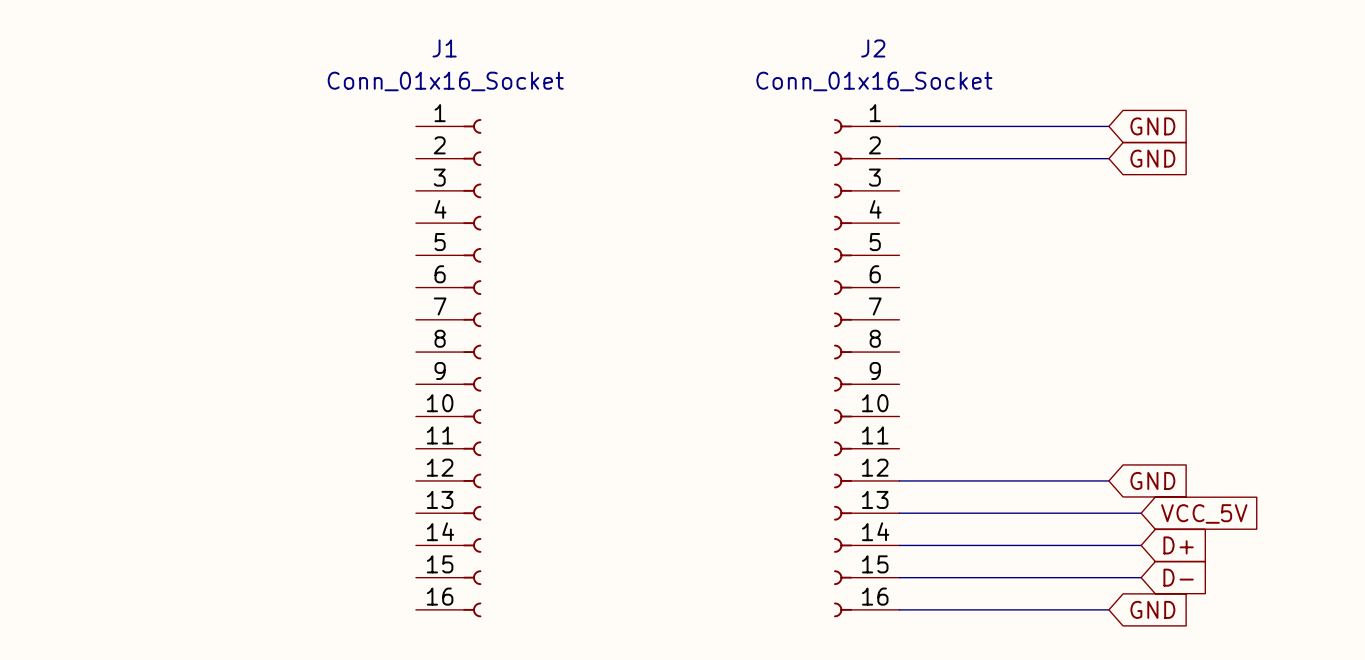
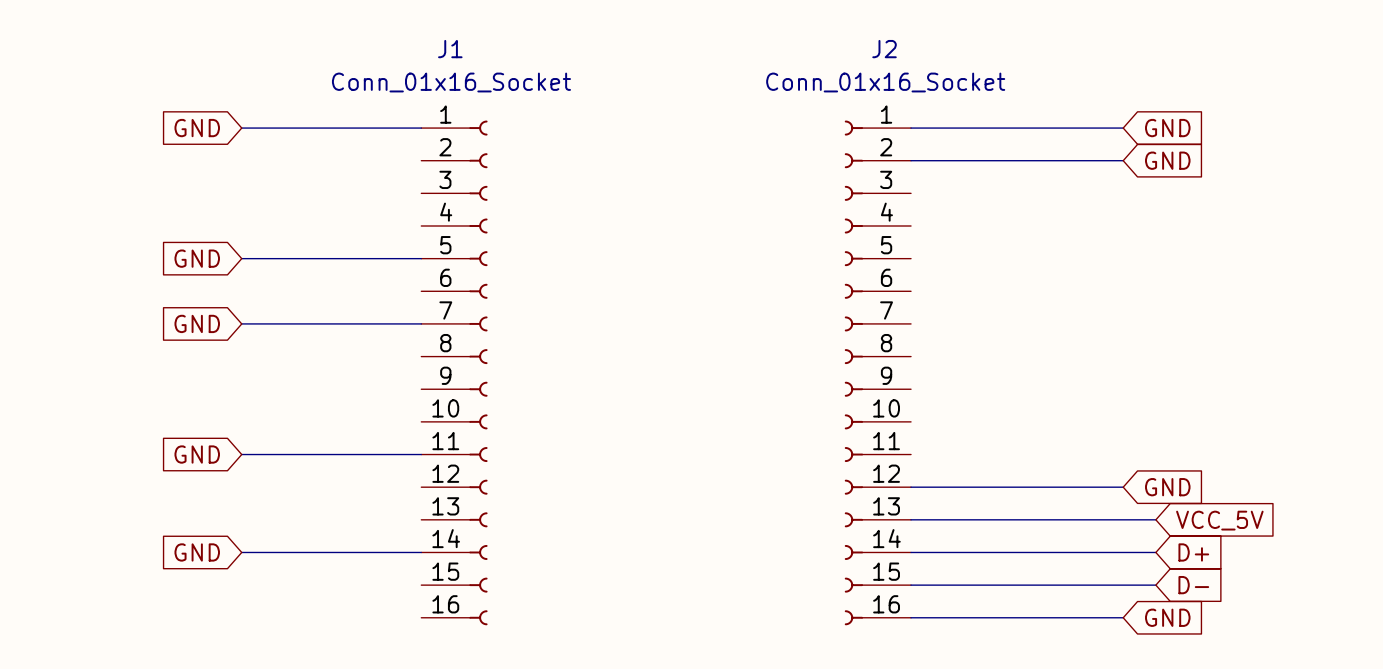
global label: none -> GND (197, 128)
wire: none -> (241, 128) (421, 128)
global label: none -> GND (197, 258)
wire: none -> (241, 258) (421, 258)
global label: none -> GND (197, 323)
wire: none -> (241, 323) (421, 323)
global label: none -> GND (197, 454)
wire: none -> (241, 454) (421, 454)
global label: none -> GND (197, 552)
wire: none -> (241, 552) (421, 552)

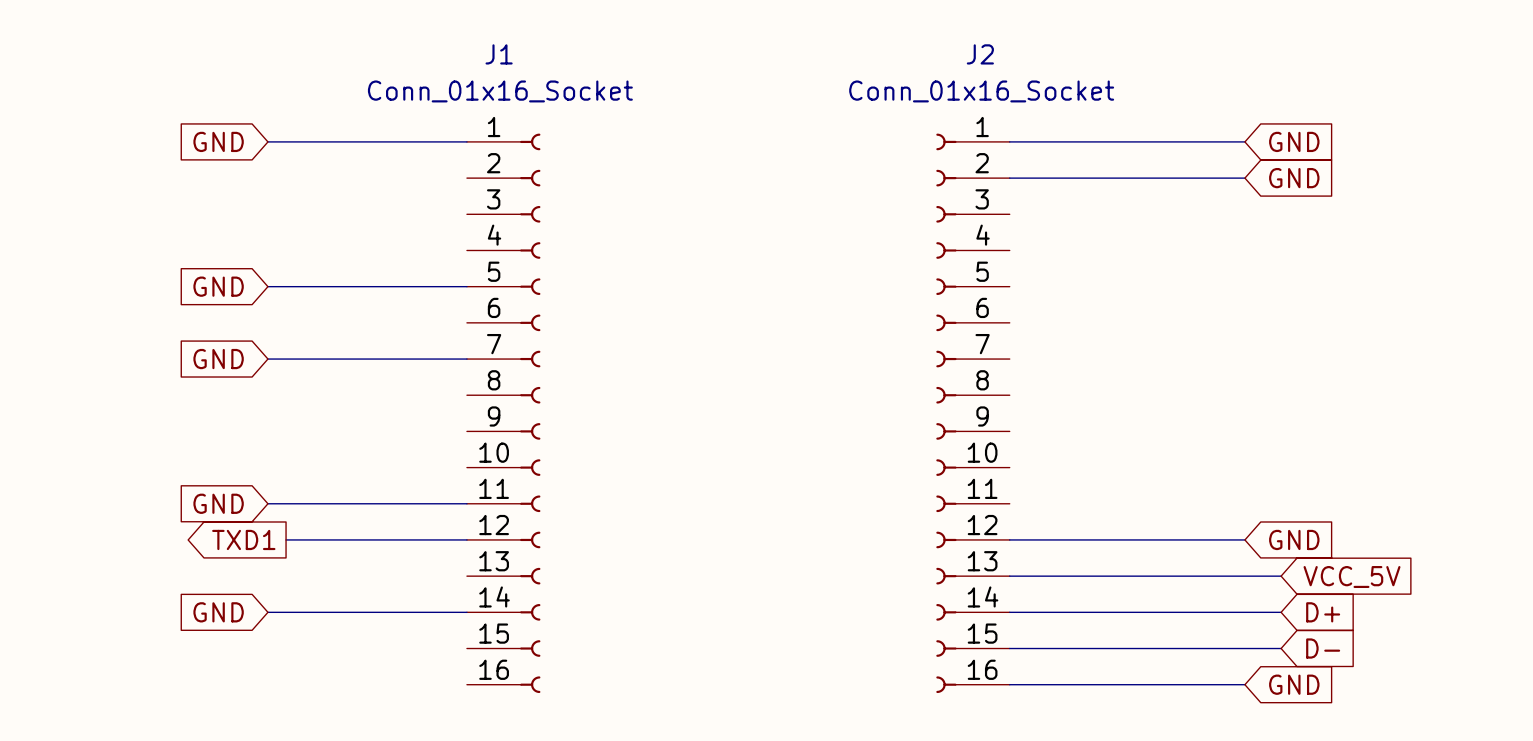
global label: none -> TXD1 (243, 539)
wire: none -> (286, 539) (466, 539)

